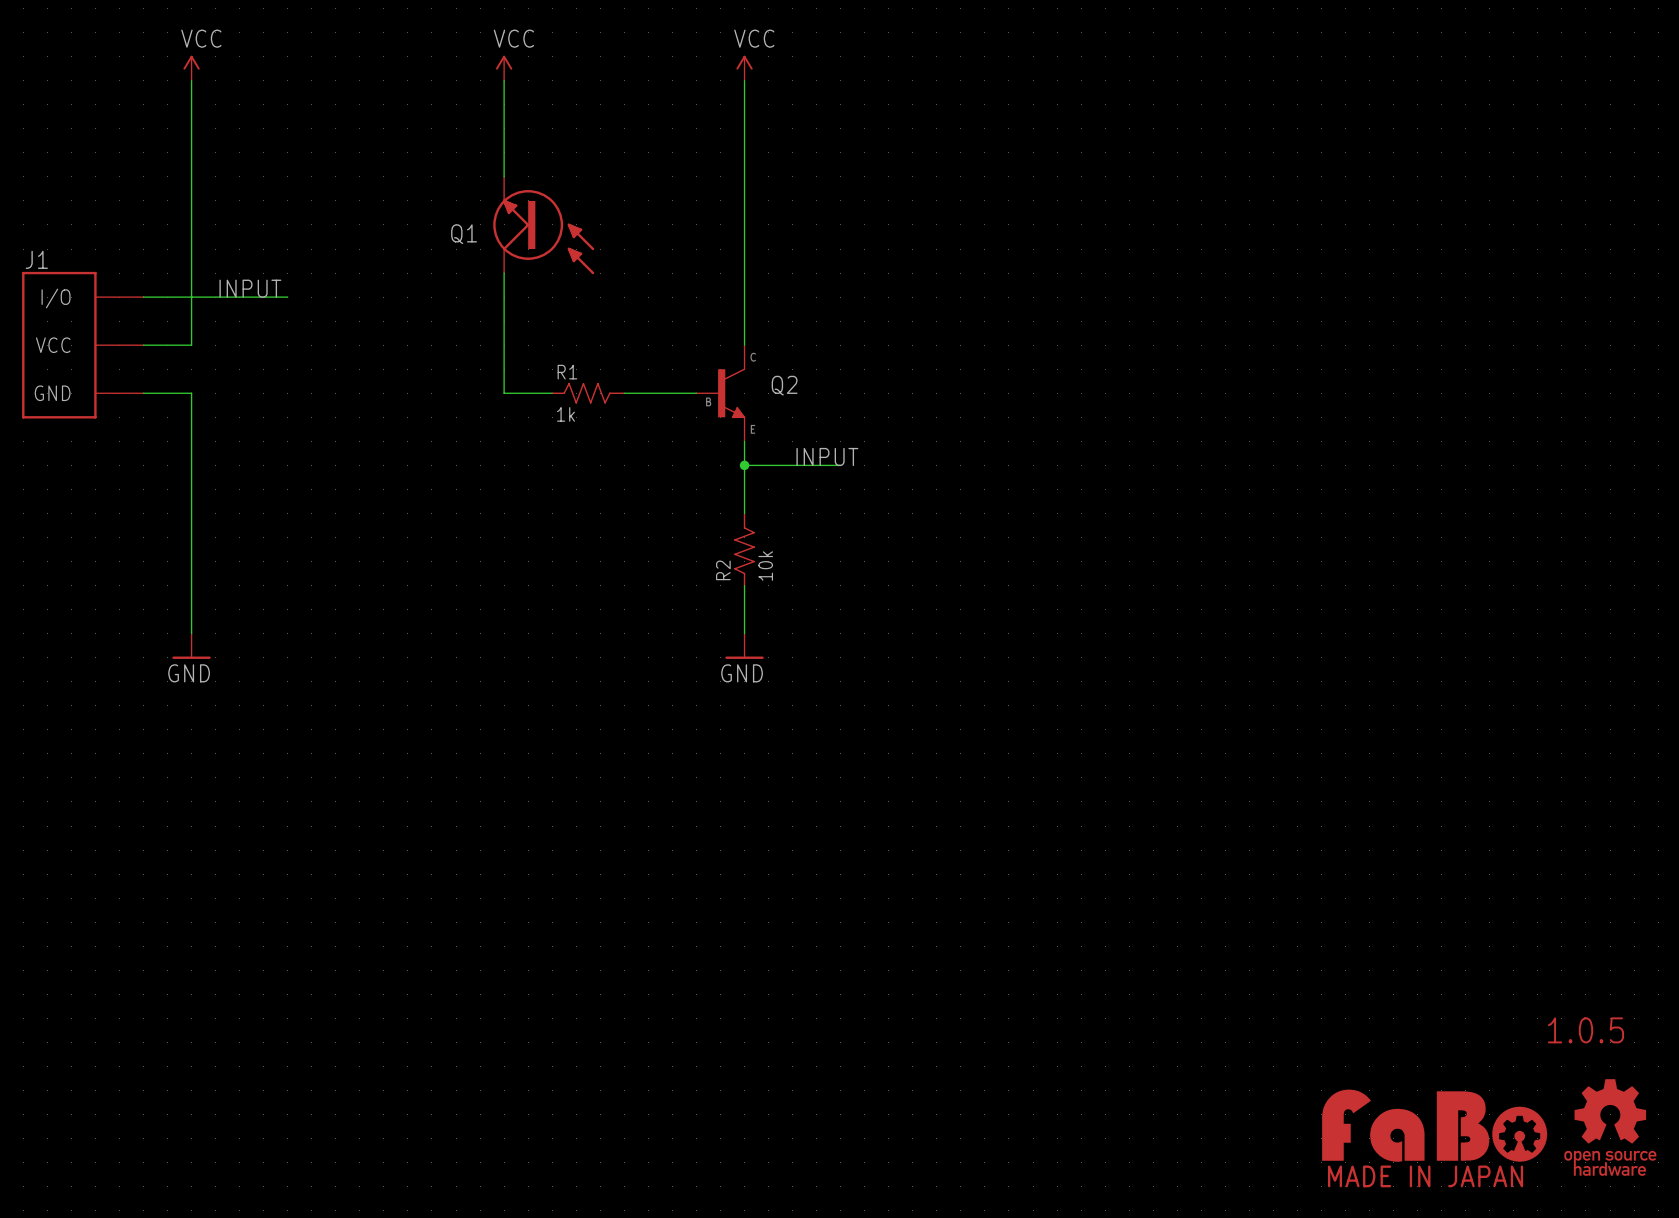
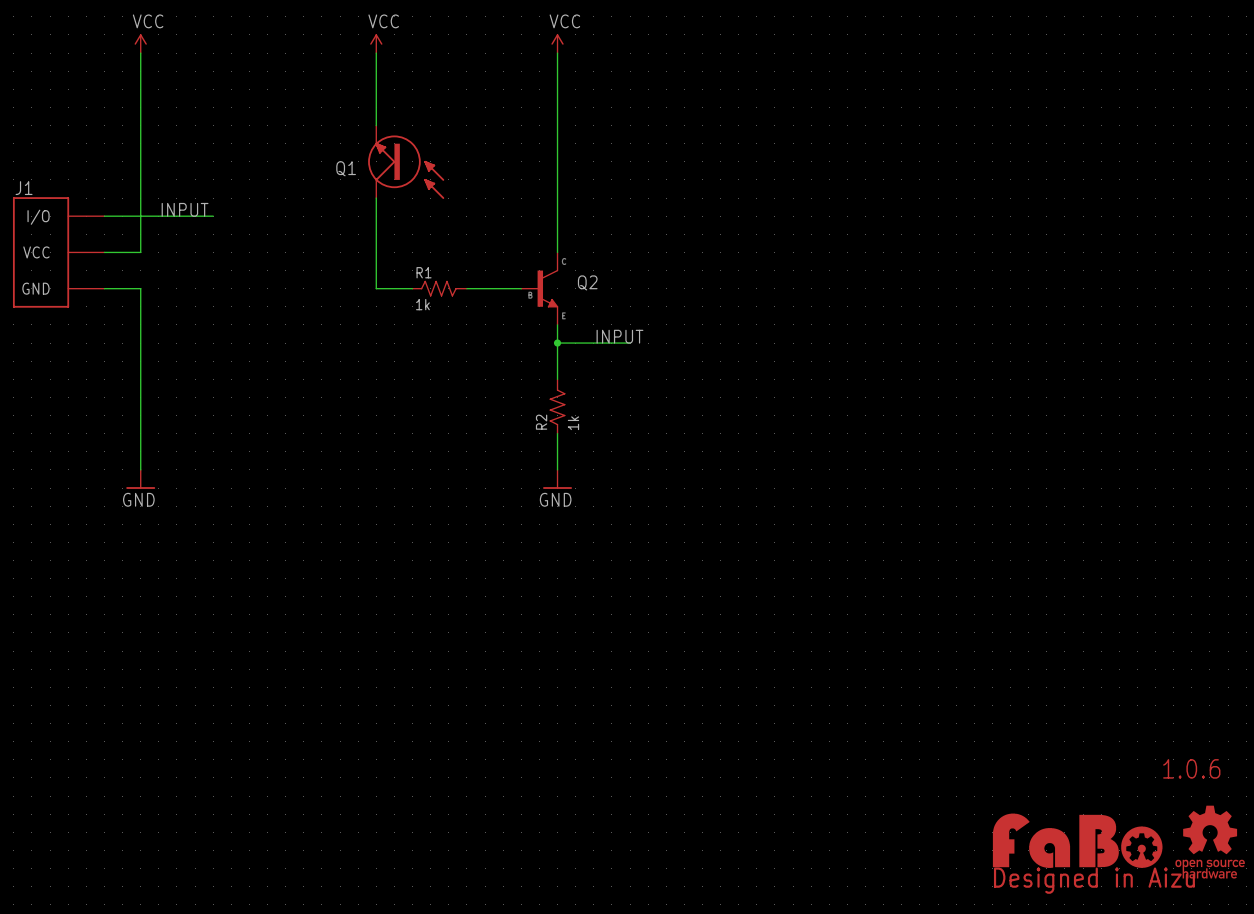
R2 value: 10k (765, 566) -> 1k (573, 423)
text: 1.0.5 (1585, 1030) -> 1.0.6 (1191, 768)
part text: MADE IN JAPAN (1425, 1176) -> none
part text: none -> Designed in Aizu (1094, 880)

